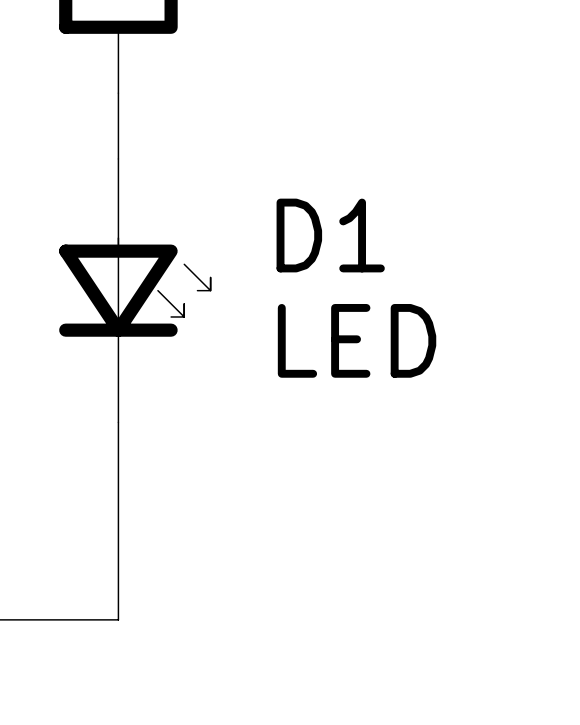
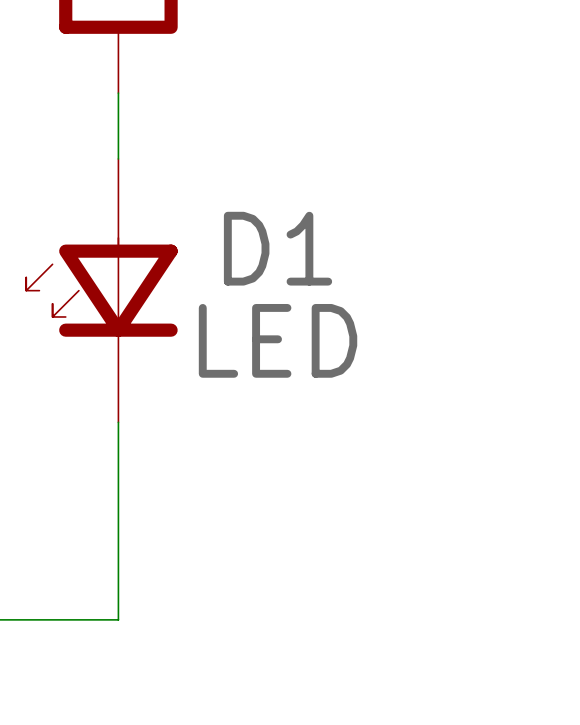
D1 flip: as is (134, 287) -> left-right (101, 287)

